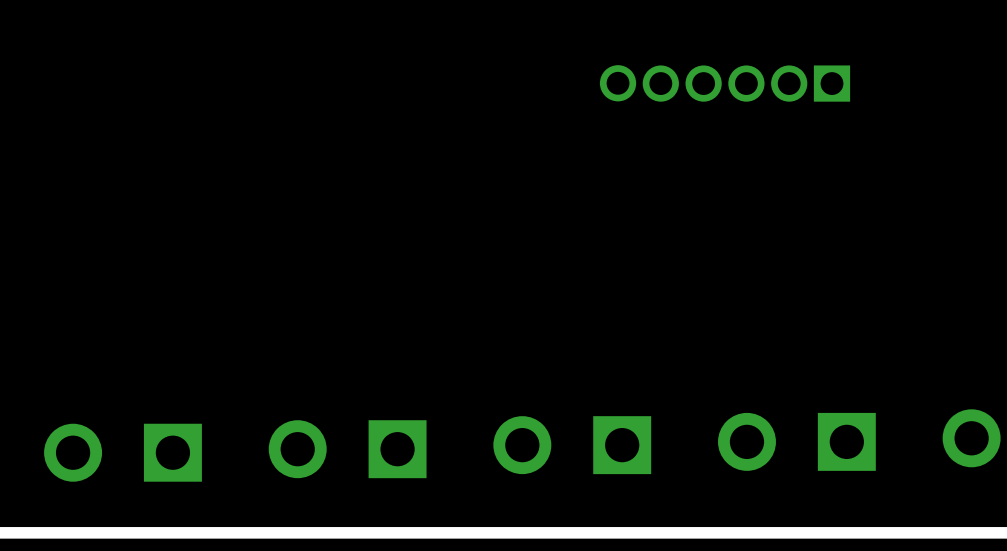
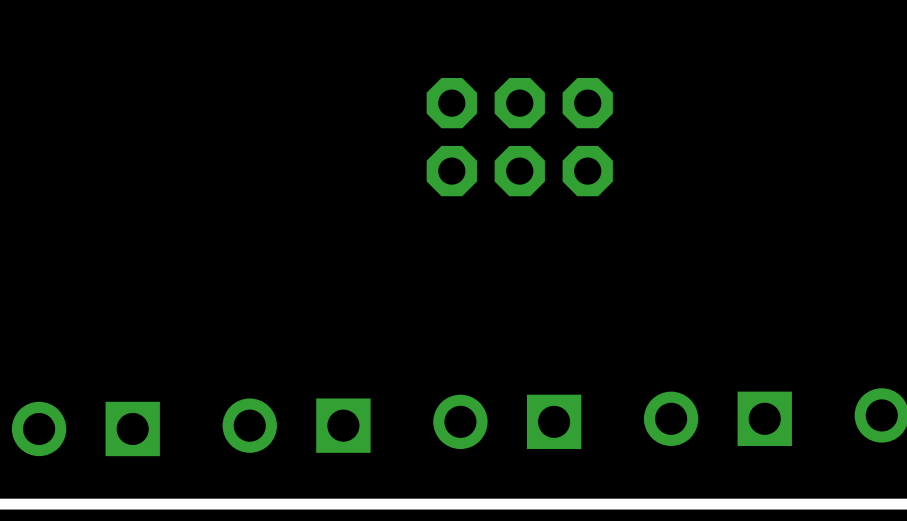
part: (725, 83) -> none
part: none -> (519, 137)

